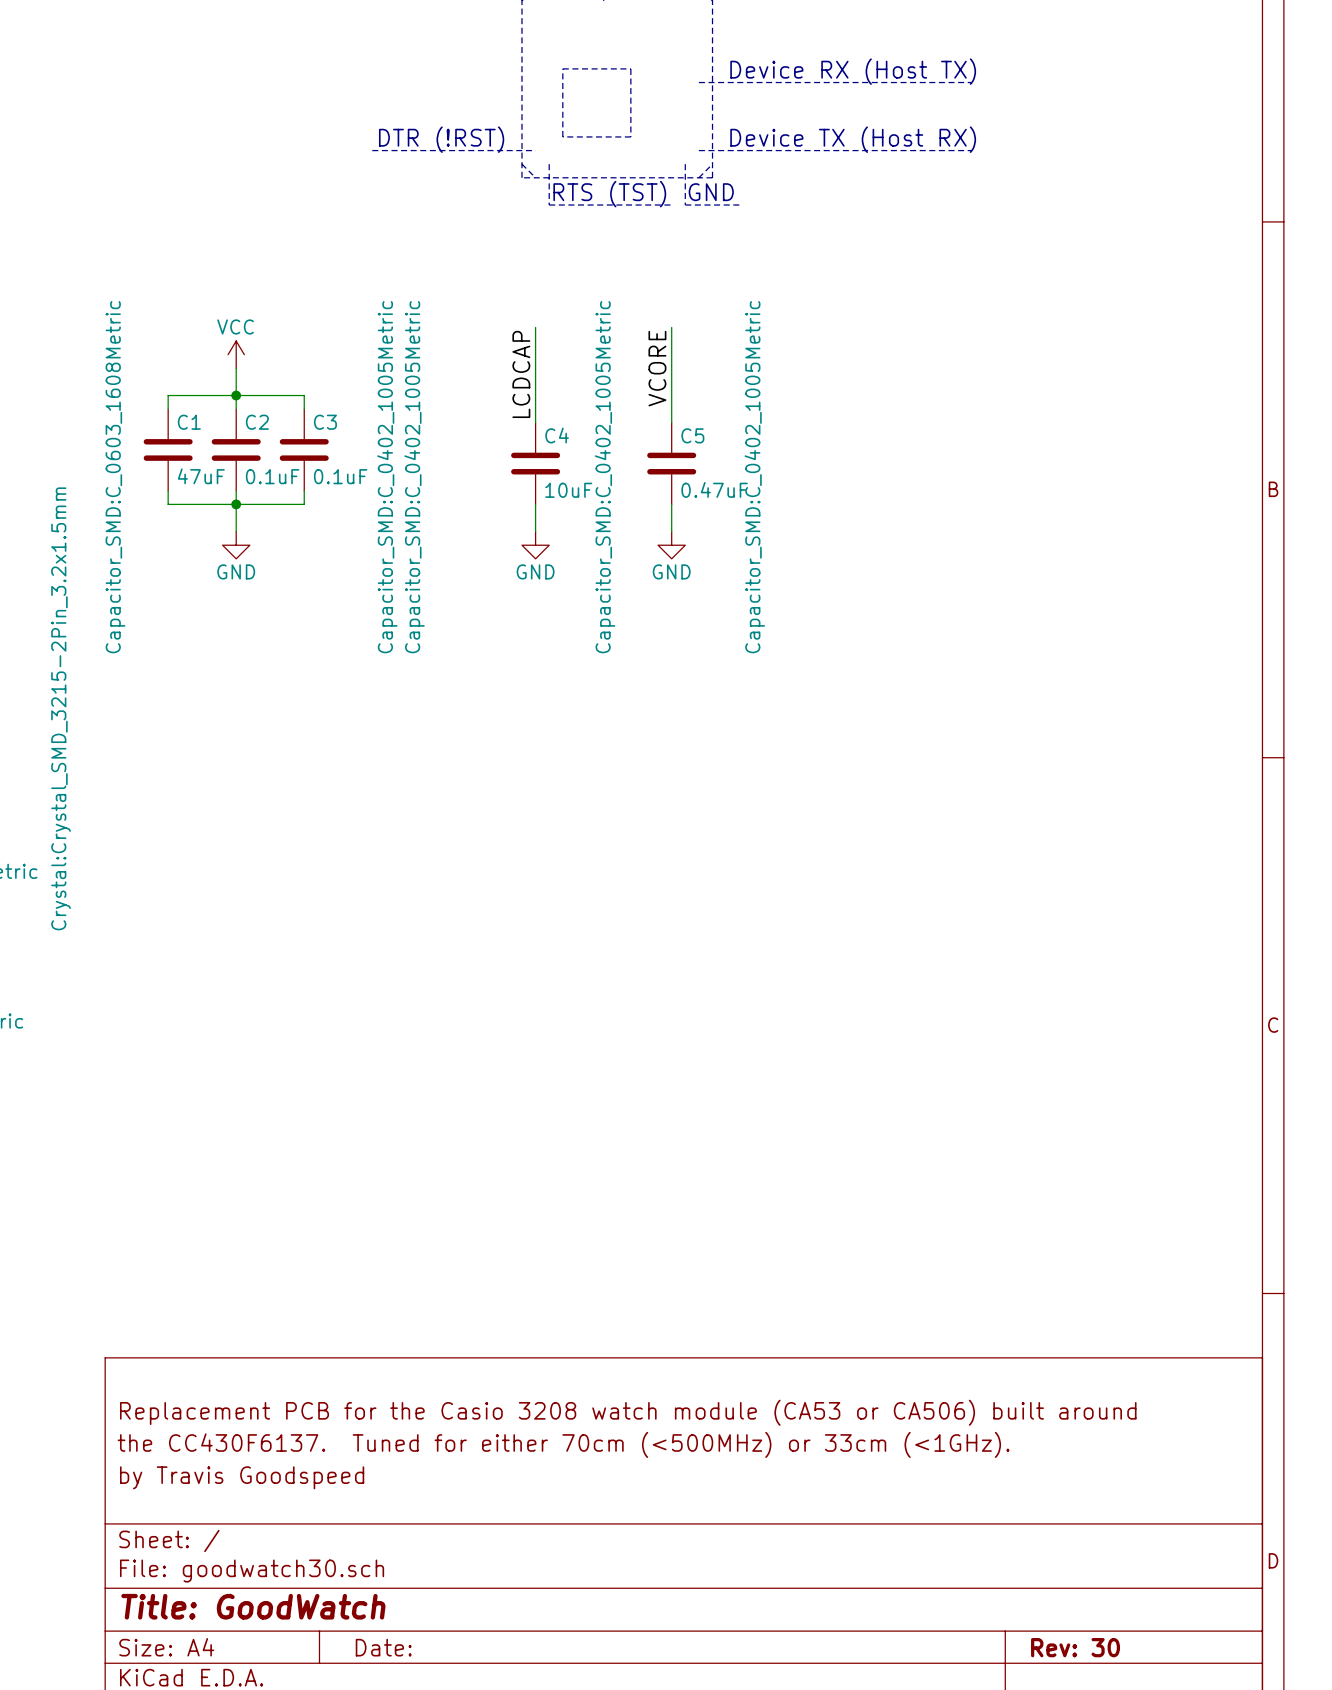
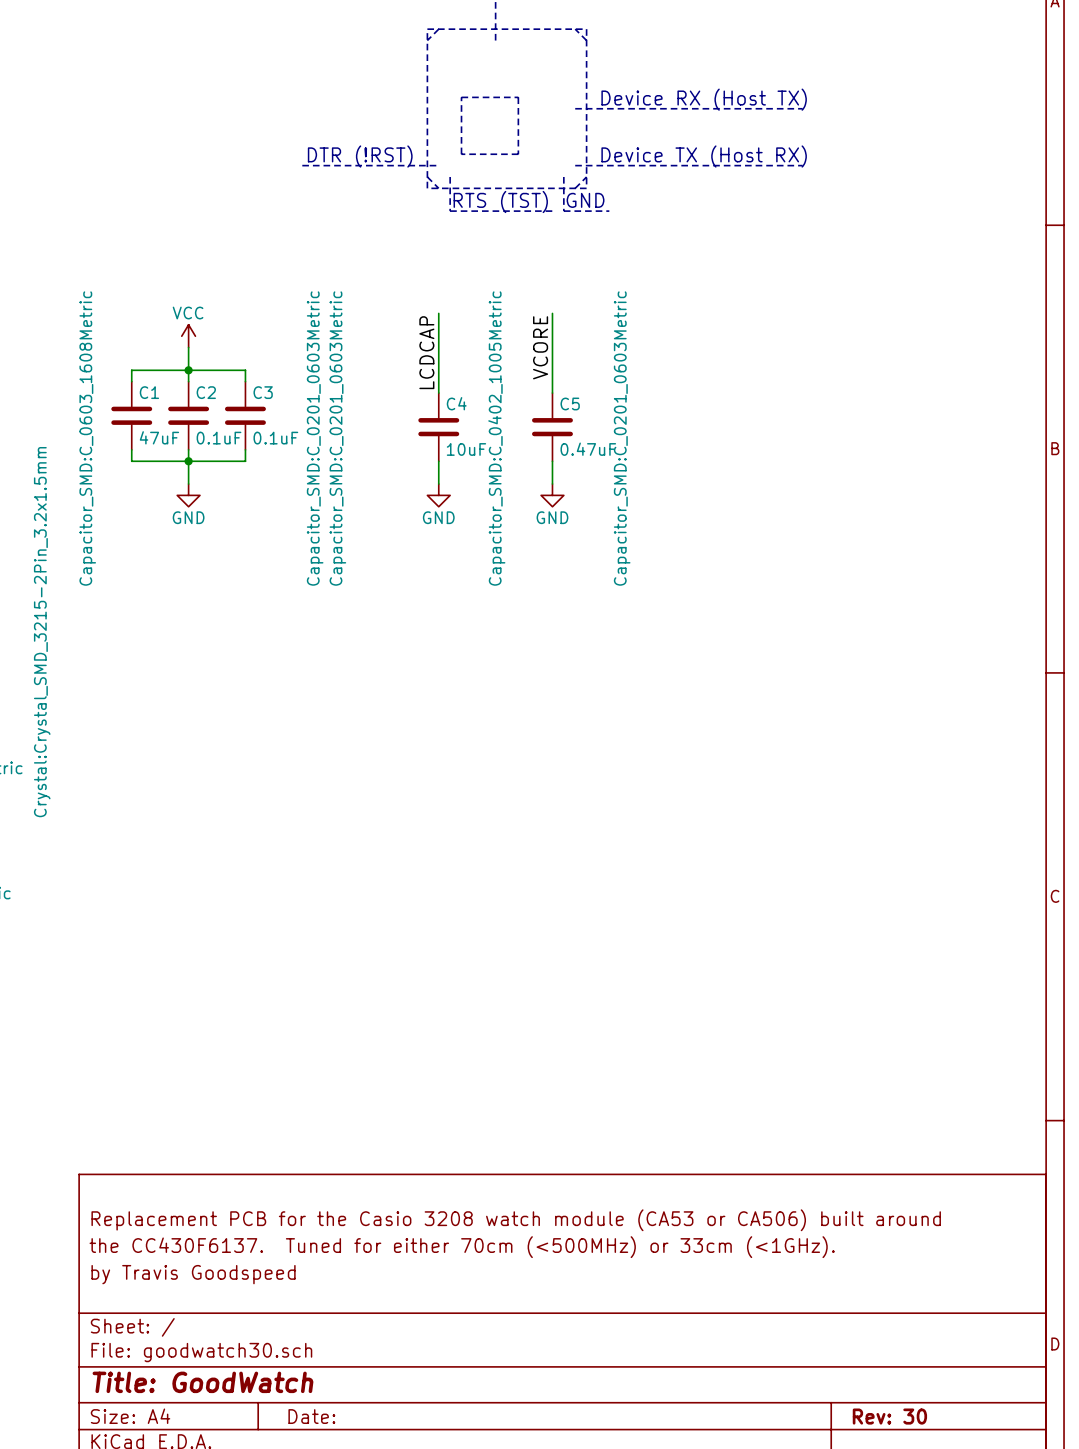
C2 text: Capacitor_SMD:C_0402_1005Metric (387, 477) -> Capacitor_SMD:C_0201_0603Metric (315, 438)
C3 text: Capacitor_SMD:C_0402_1005Metric (414, 477) -> Capacitor_SMD:C_0201_0603Metric (337, 438)
C5 text: Capacitor_SMD:C_0402_1005Metric (754, 477) -> Capacitor_SMD:C_0201_0603Metric (622, 438)

